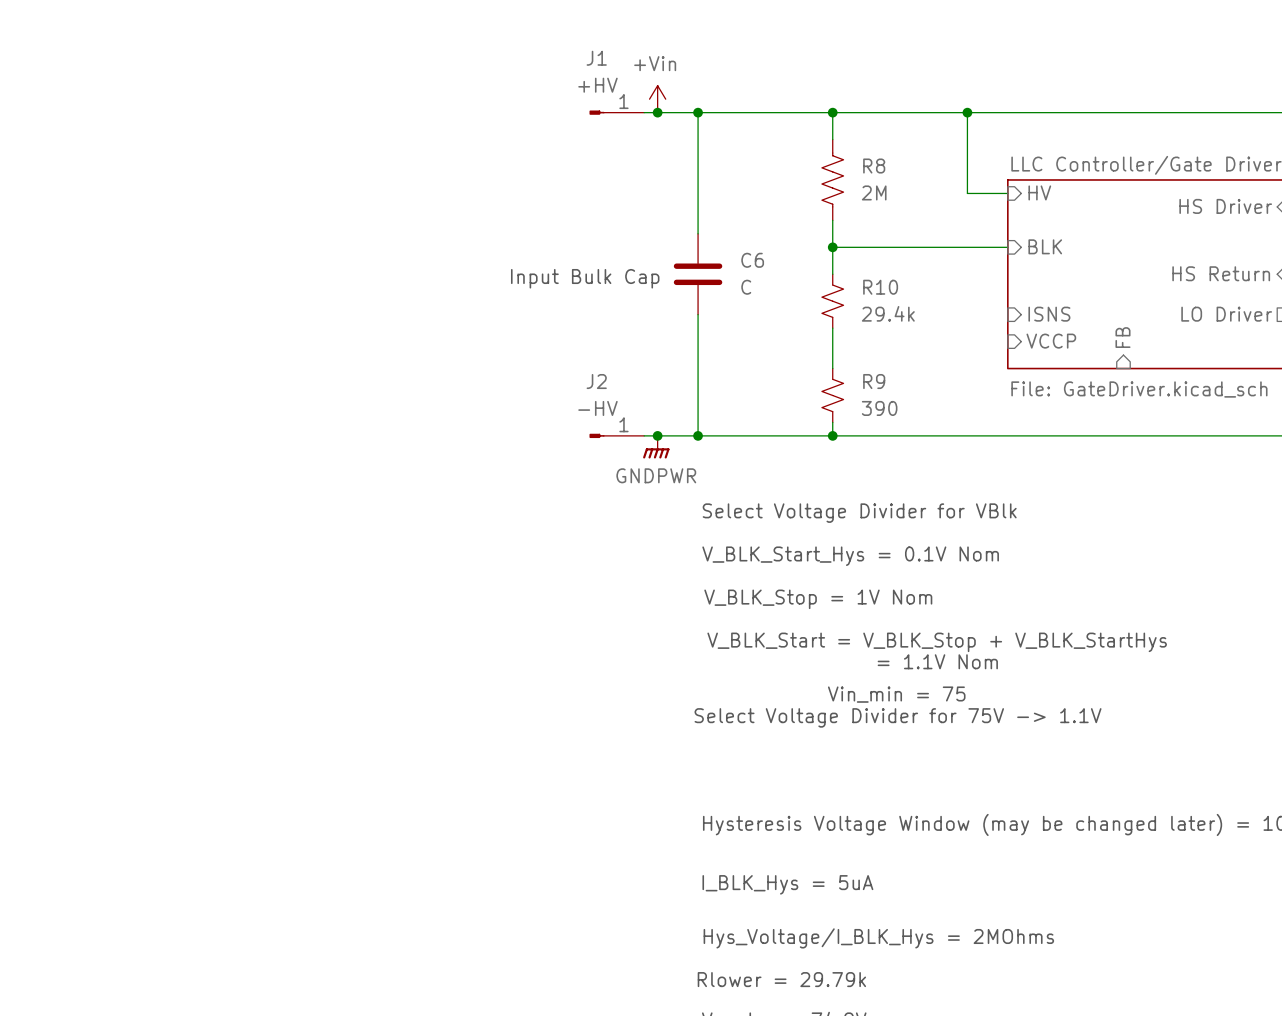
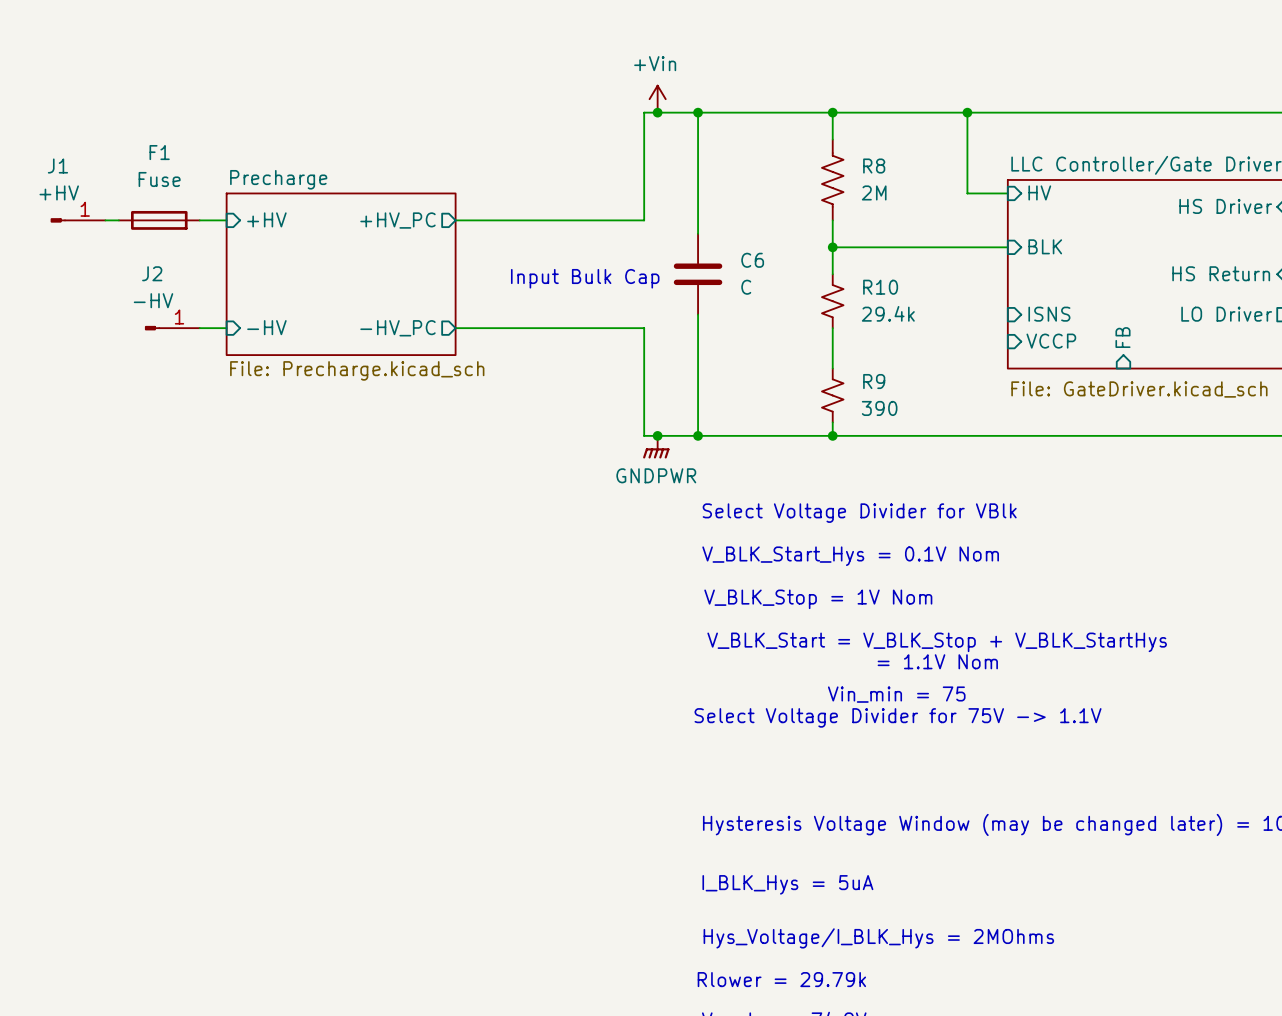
J1 position: (616, 112) -> (78, 220)
wire: none -> (644, 112) (644, 220) (455, 220)
sheet pin: none -> +HV (266, 219)
wire: none -> (105, 220) (118, 220)
F1: none -> Fuse (159, 220)
wire: none -> (199, 220) (226, 220)
sheet pin: none -> +HV_PC (397, 220)
sheet Precharge: none -> File: Precharge.kicad_sch (341, 274)
sheet pin: none -> -HV (266, 327)
wire: none -> (199, 328) (226, 328)
sheet pin: none -> -HV_PC (397, 328)
wire: none -> (455, 328) (644, 328) (644, 435)
J2 position: (616, 435) -> (172, 328)

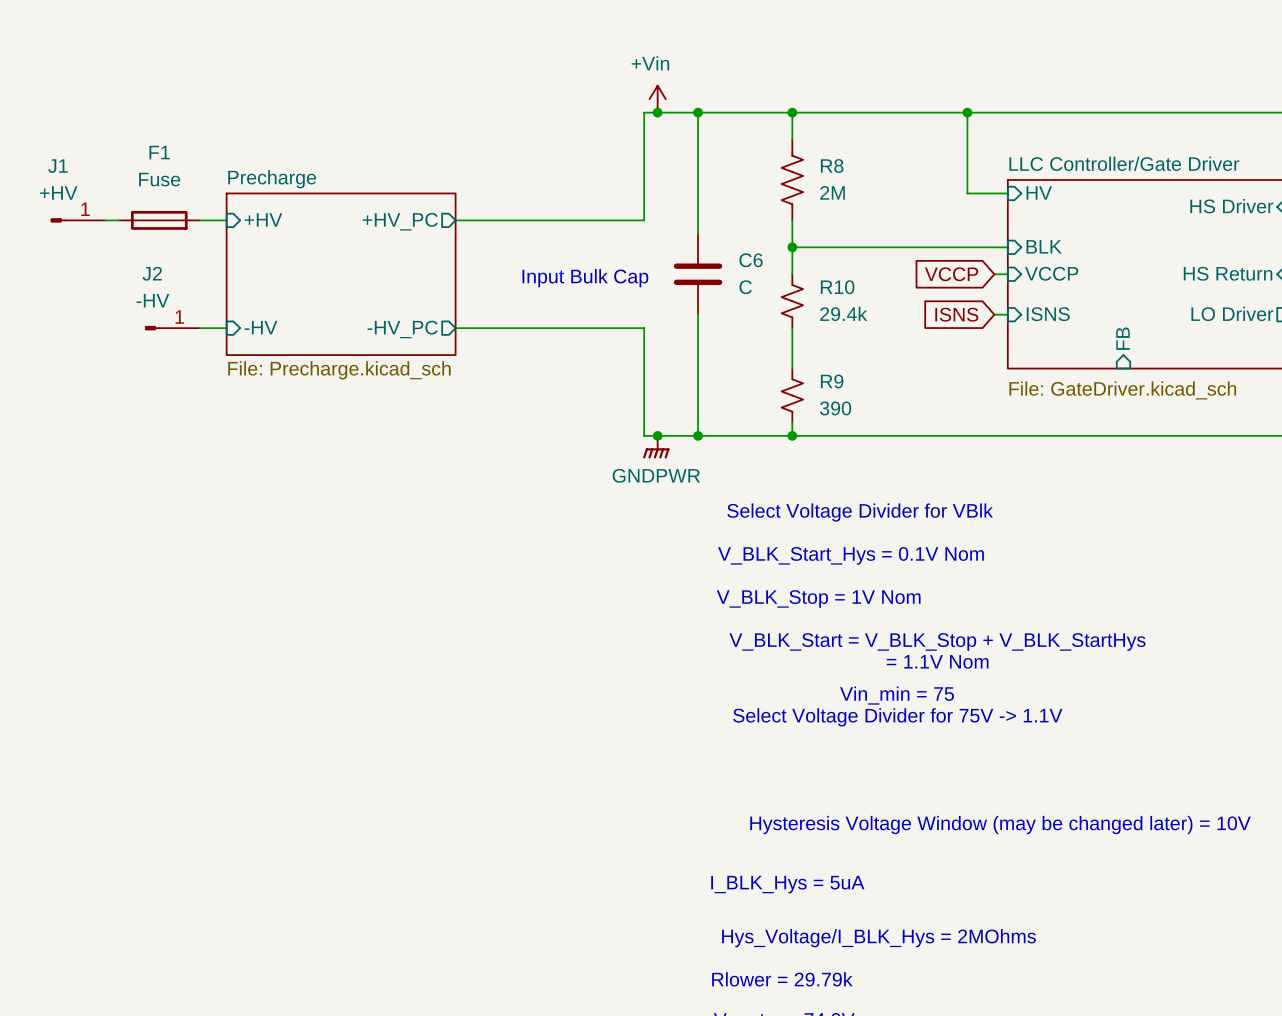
wire: (832, 112) (832, 139) -> (792, 112) (792, 139)
junction position: (832, 112) -> (792, 112)
R8 position: (832, 179) -> (792, 179)
wire: (832, 220) (832, 274) -> (792, 220) (792, 274)
wire: none -> (792, 247) (832, 247)
junction position: (832, 247) -> (792, 247)
global label: none -> VCCP (951, 274)
wire: none -> (994, 274) (1007, 274)
R10 position: (832, 301) -> (792, 301)
global label: none -> ISNS (956, 314)
wire: none -> (994, 314) (1007, 314)
wire: (832, 328) (832, 368) -> (792, 328) (792, 368)
sheet pin position: VCCP (1051, 341) -> VCCP (1051, 273)
R9 position: (832, 395) -> (792, 395)
wire: (832, 422) (832, 435) -> (792, 422) (792, 435)
junction position: (832, 435) -> (792, 435)

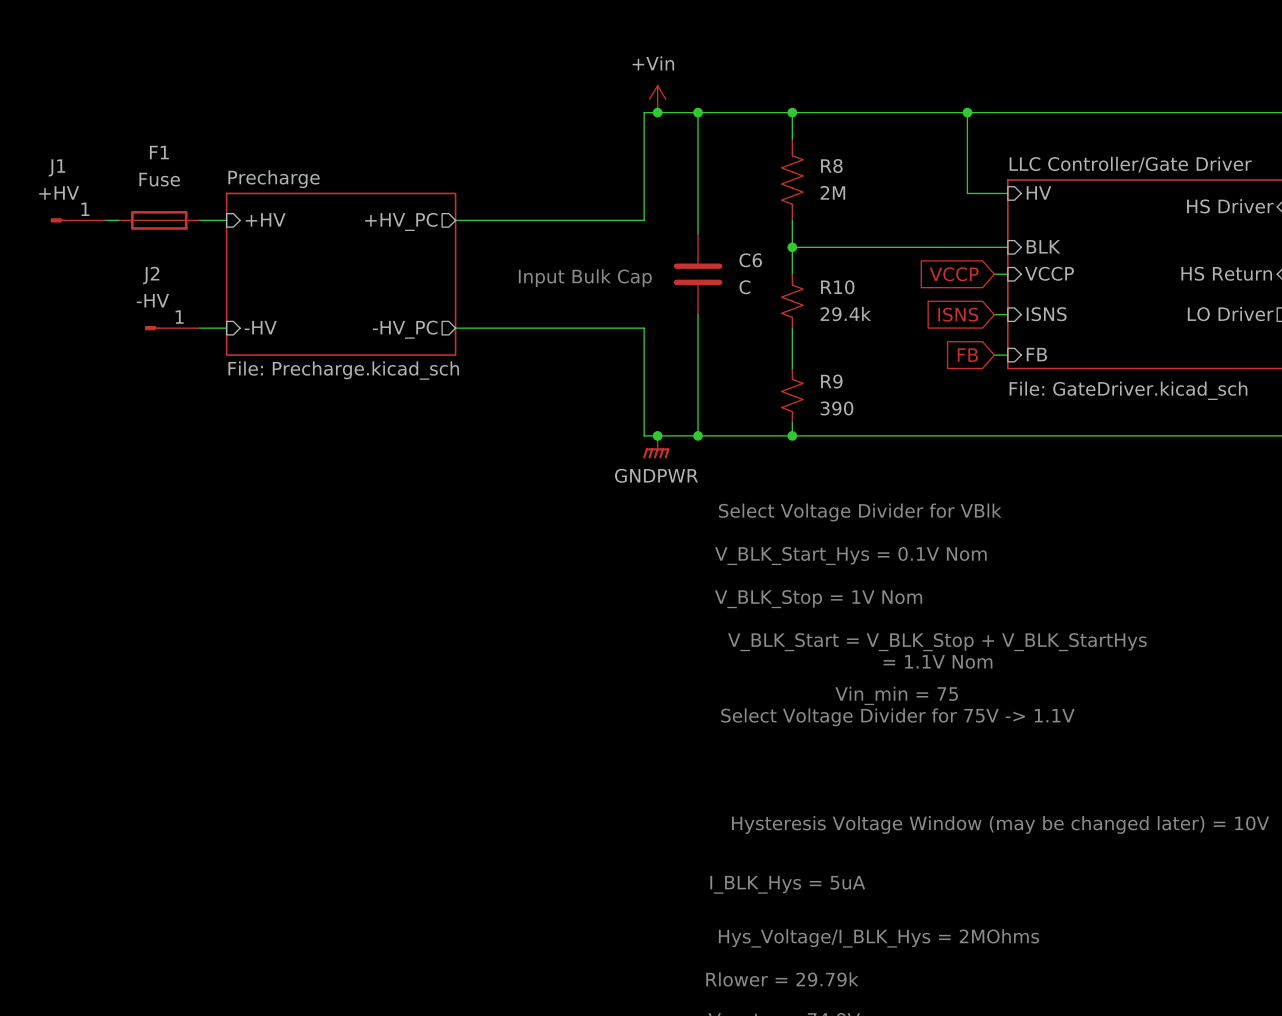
sheet pin rotation: 0° (1122, 338) -> 90° clockwise (1036, 354)
sheet pin position: FB (1122, 338) -> FB (1036, 354)
global label: none -> FB (967, 355)
wire: none -> (994, 355) (1007, 355)

